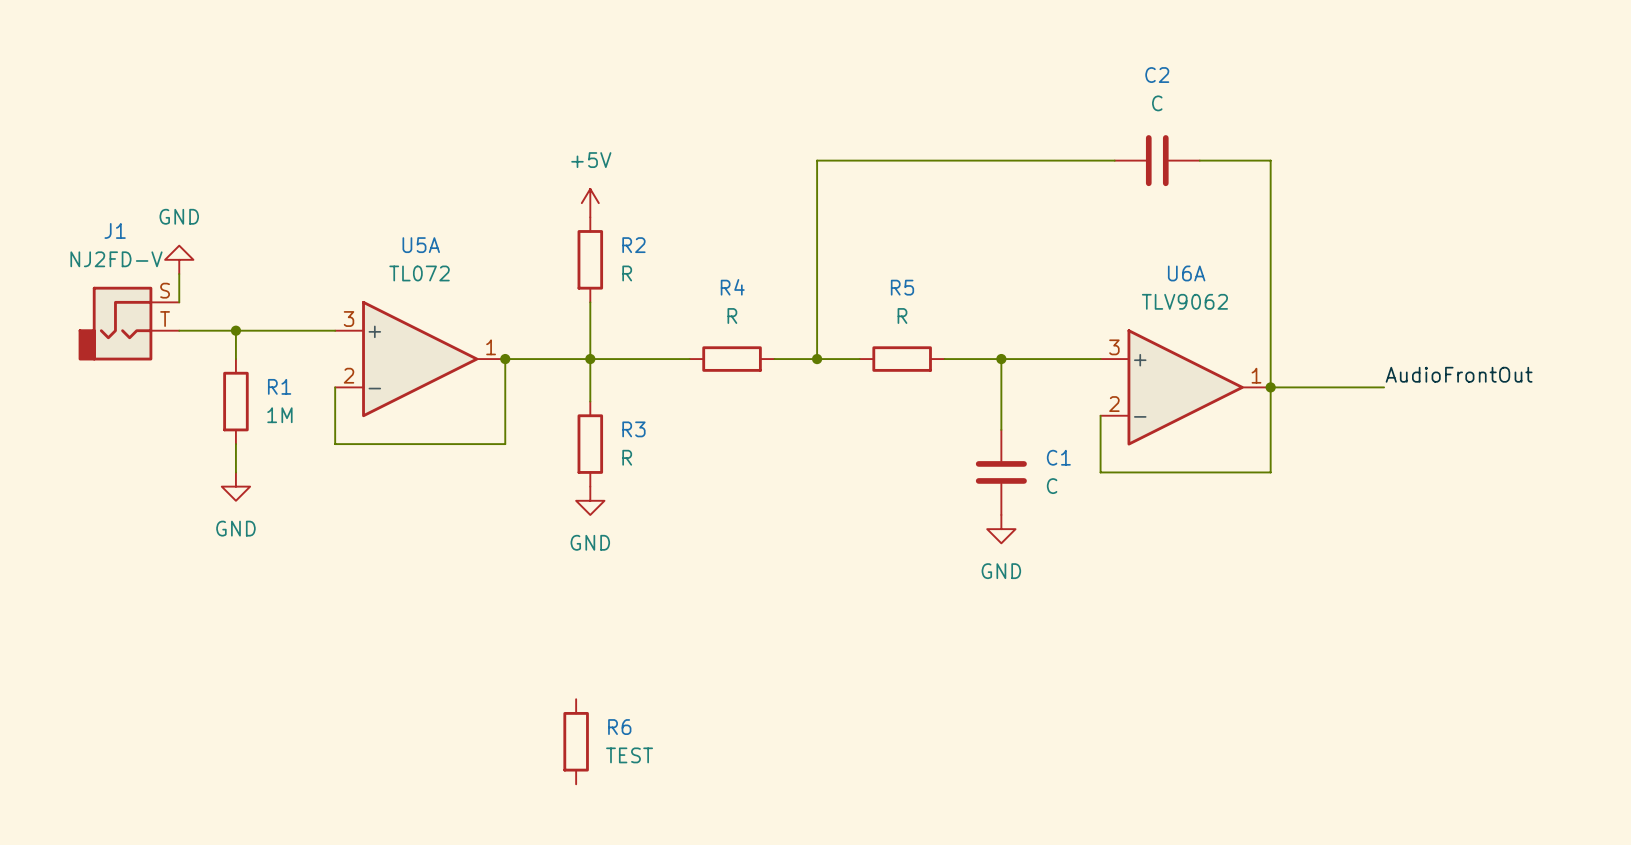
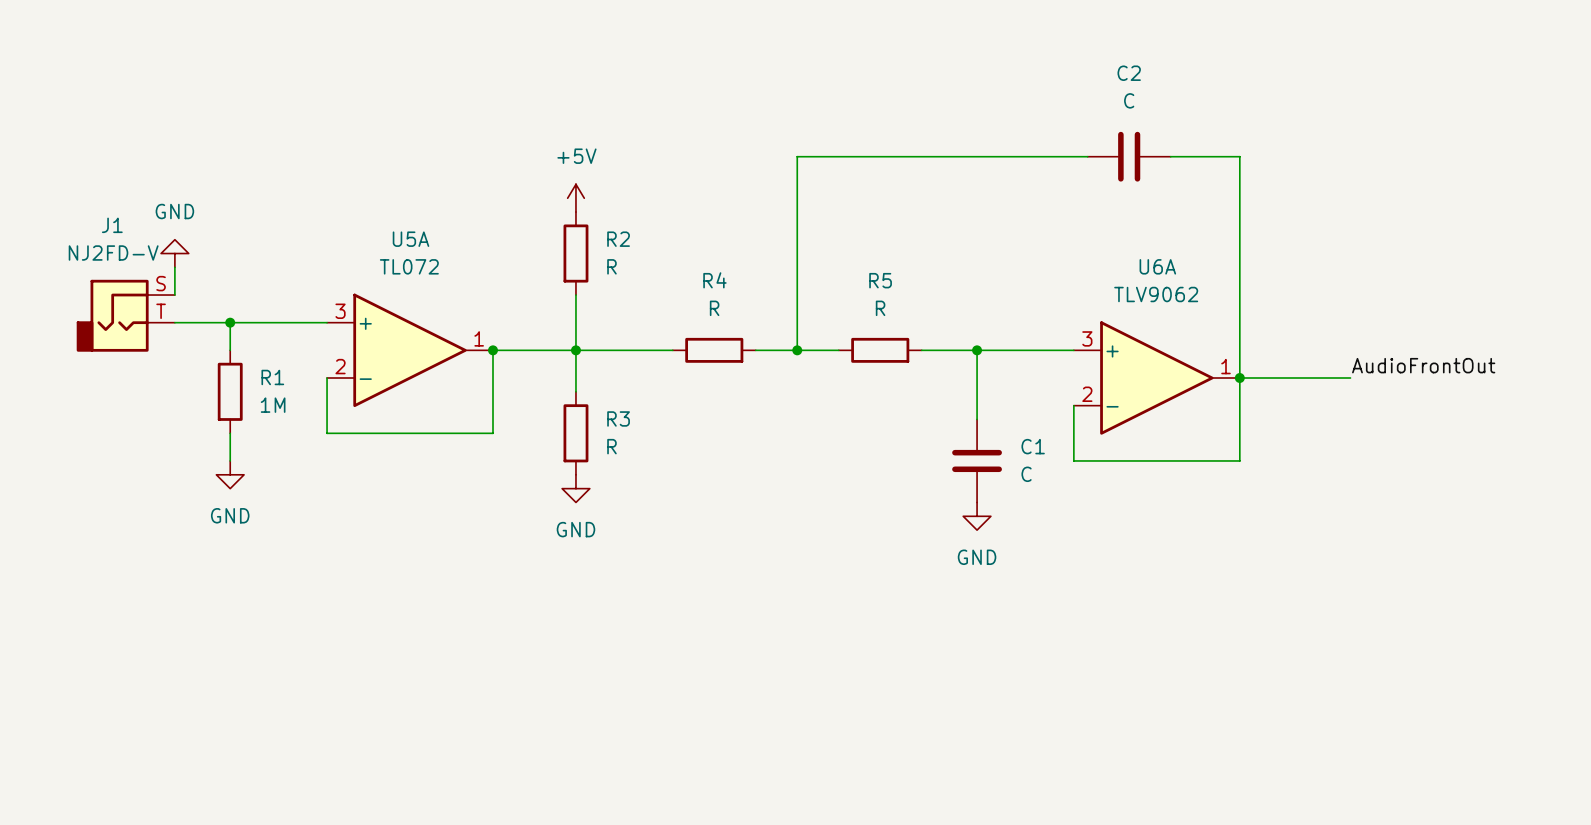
R6: TEST (576, 741) -> none

